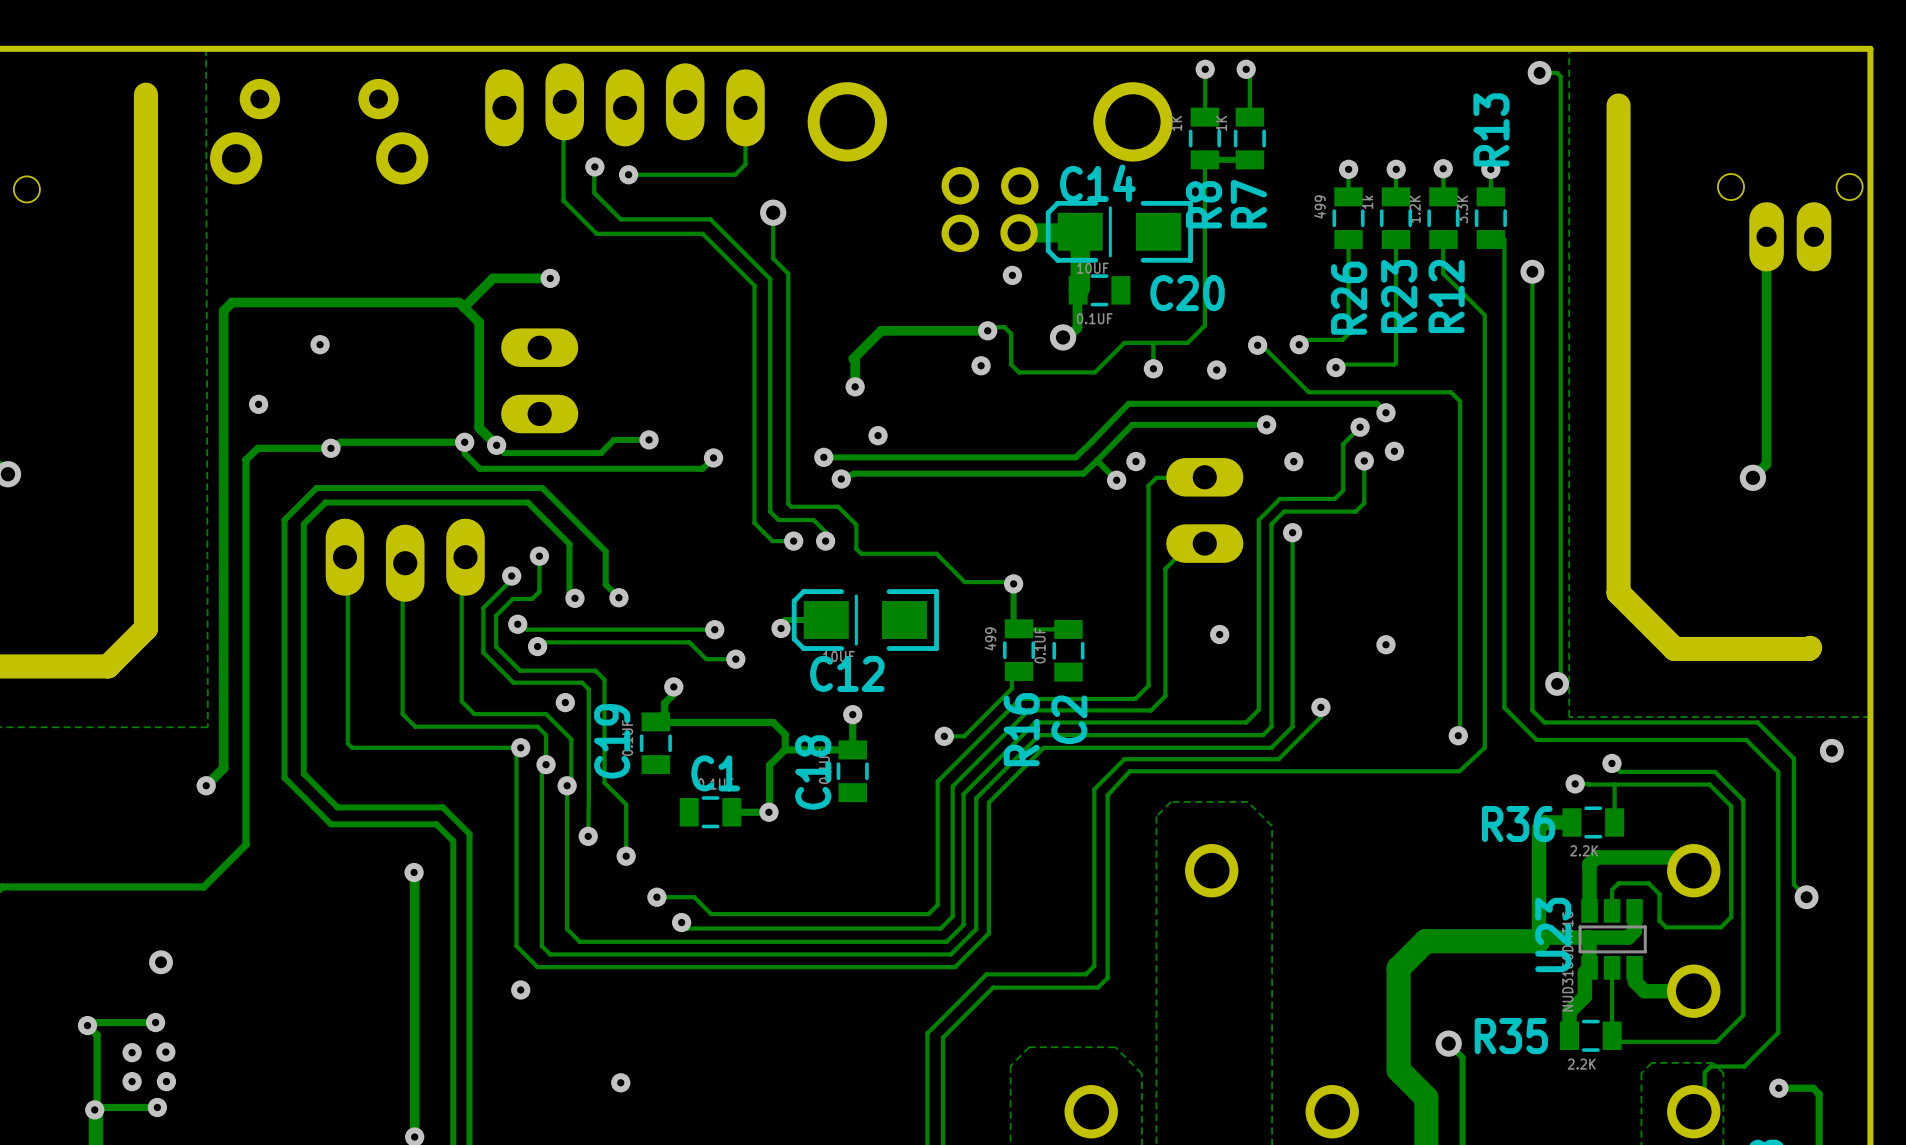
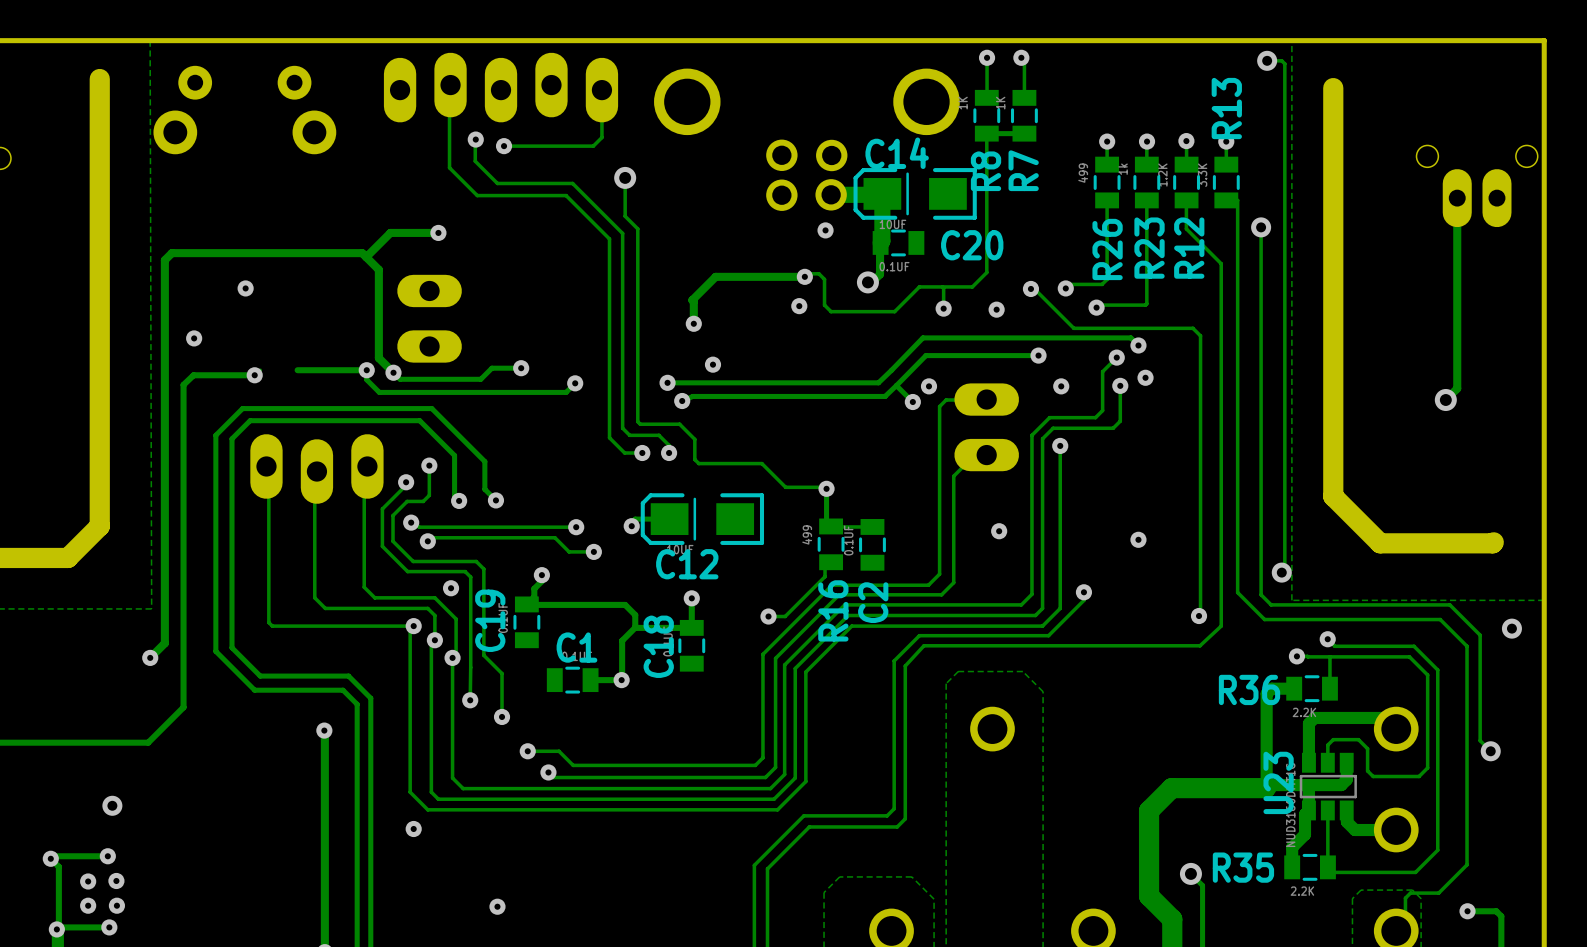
track: (382, 442) (340, 442) (330, 451) (330, 448) -> none

